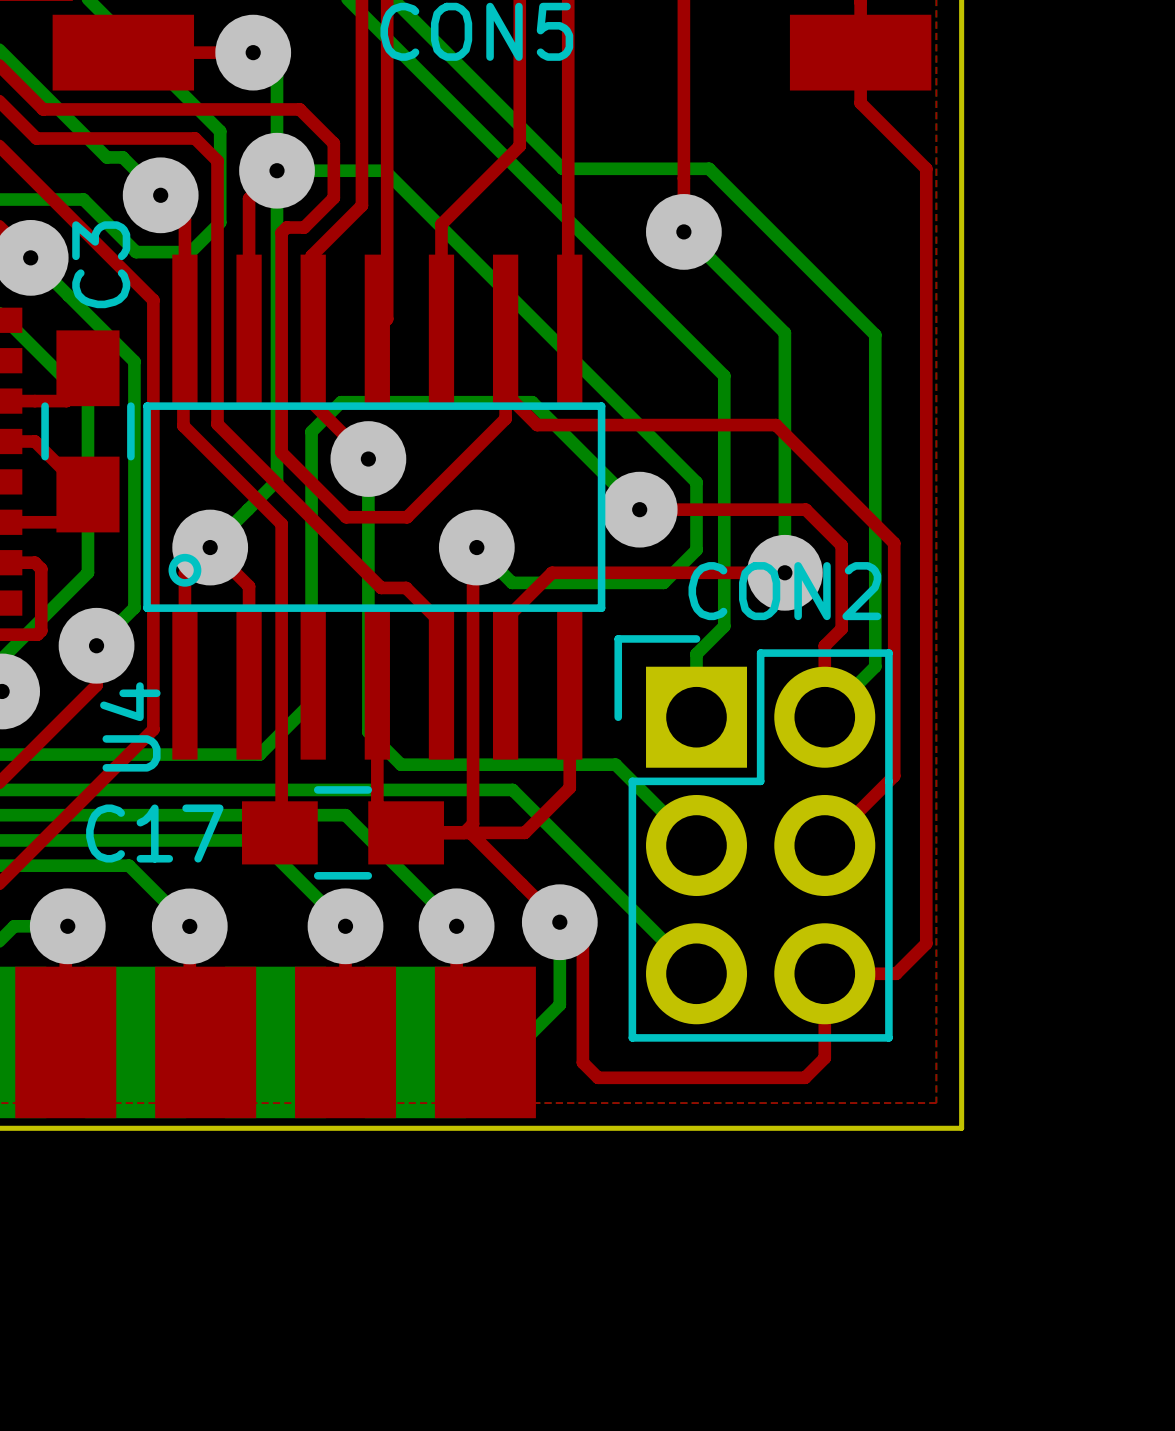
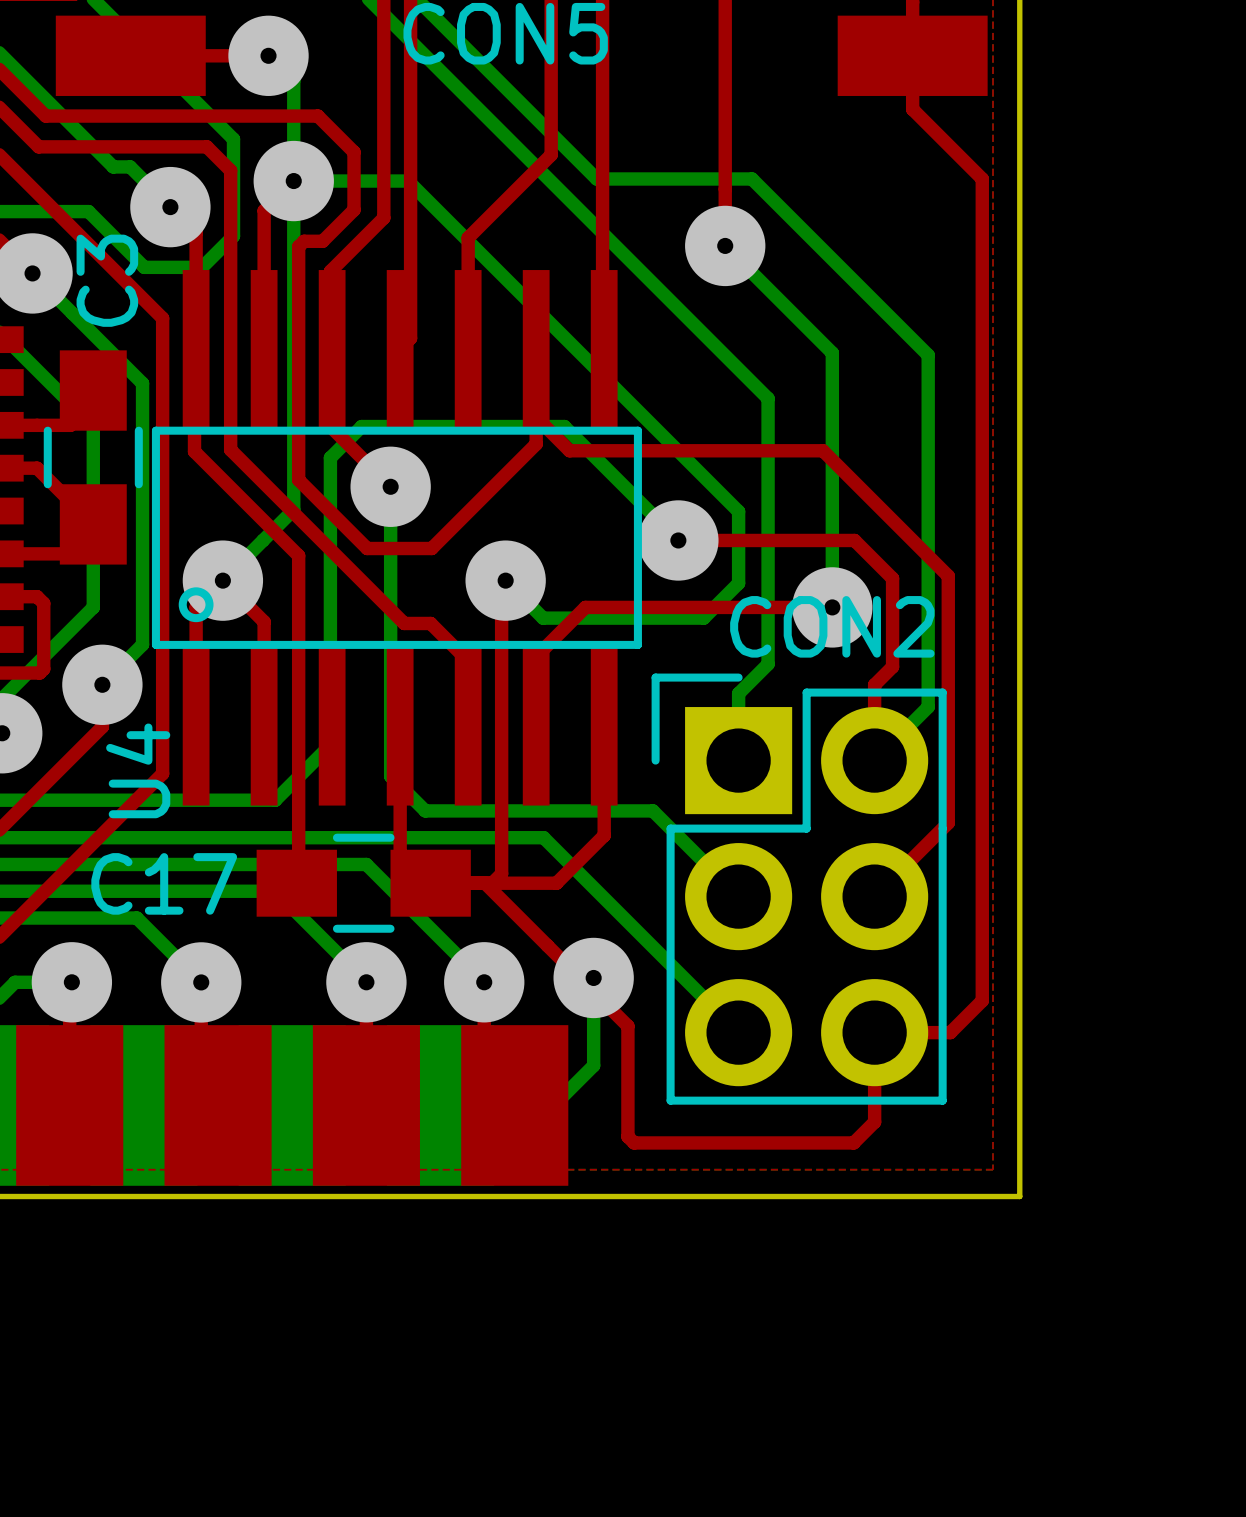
top track: (470, 832) (582, 945) (582, 1062) (592, 1071) -> (485, 883) (627, 1026) (627, 1136)

